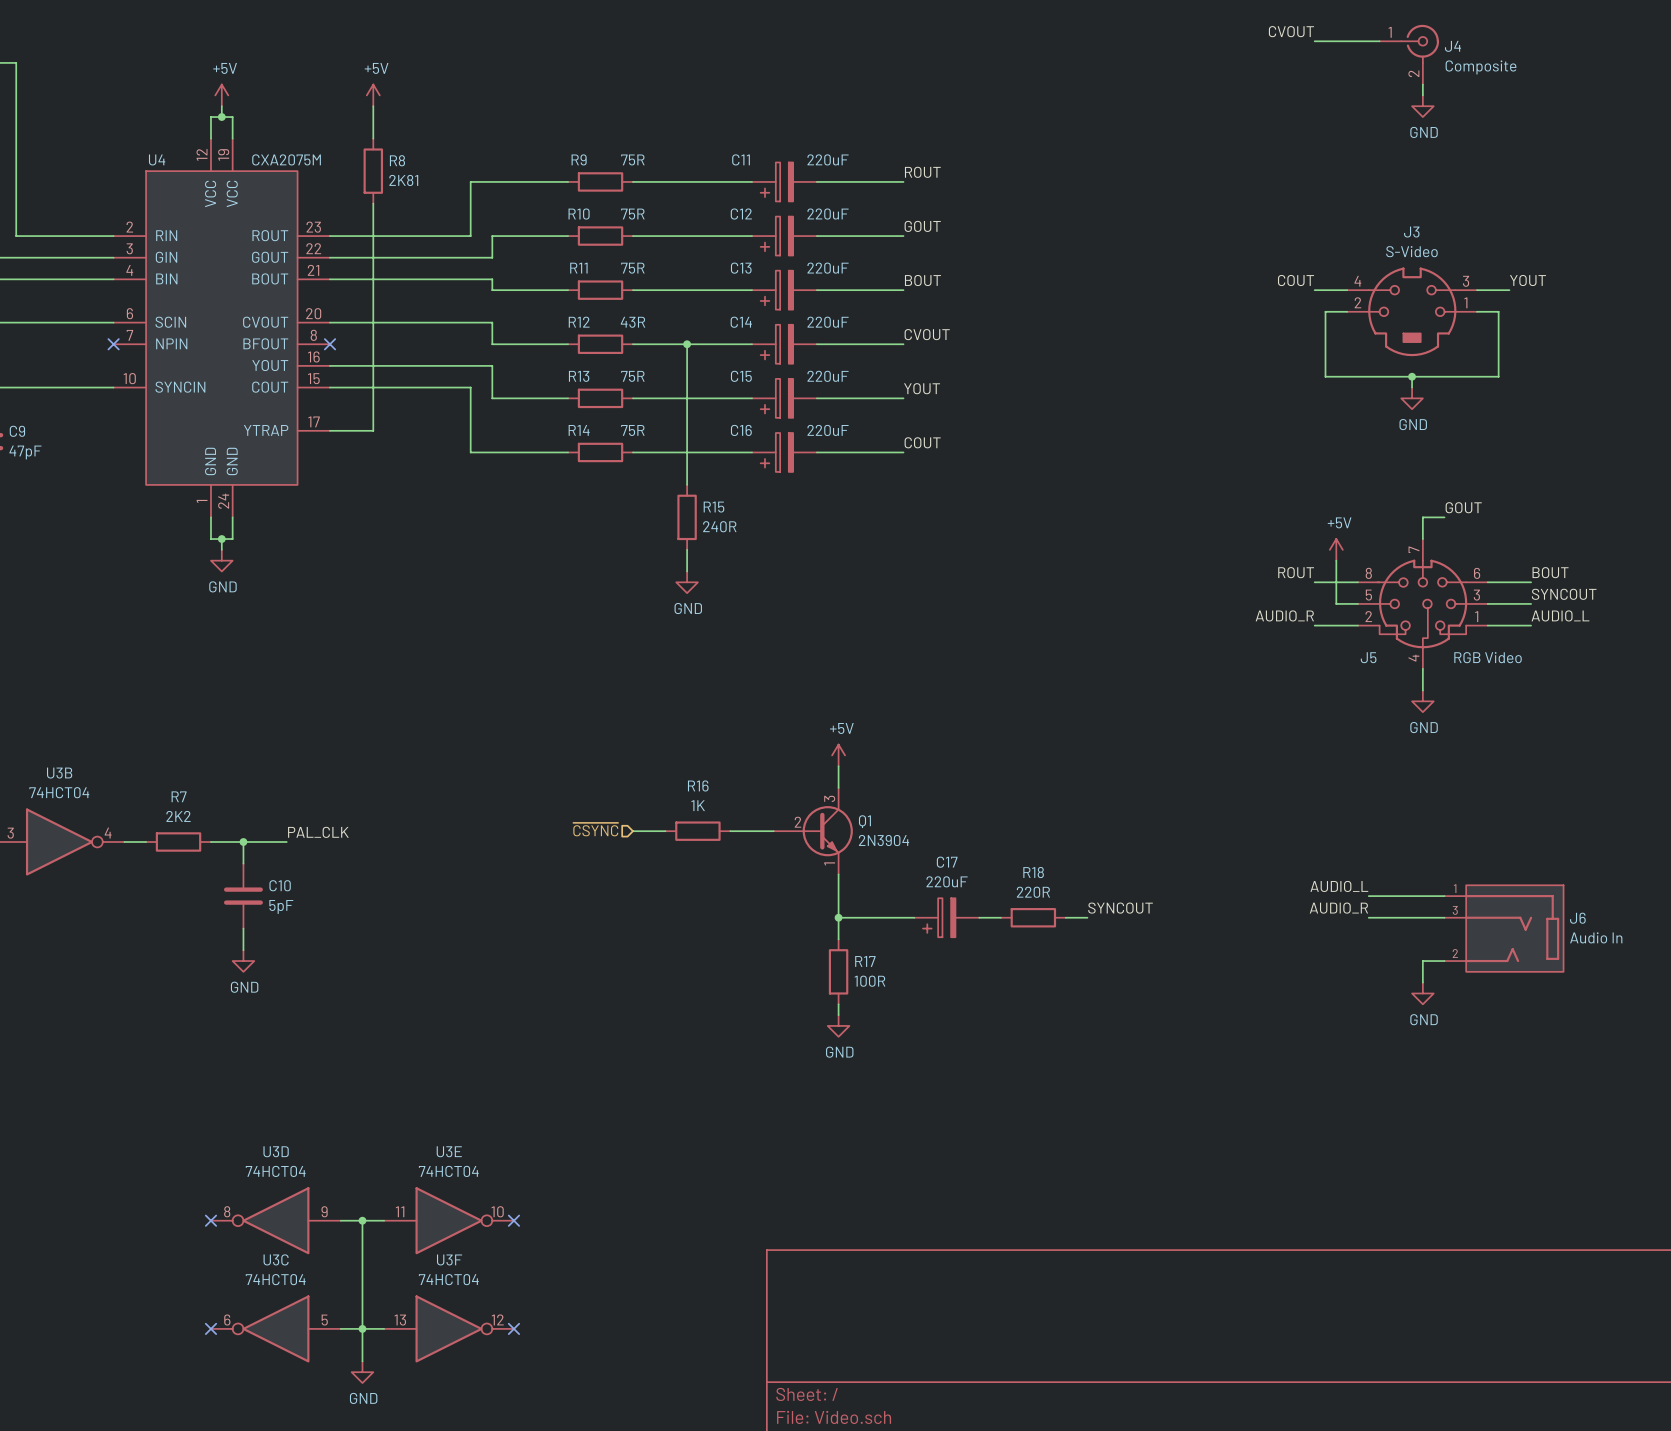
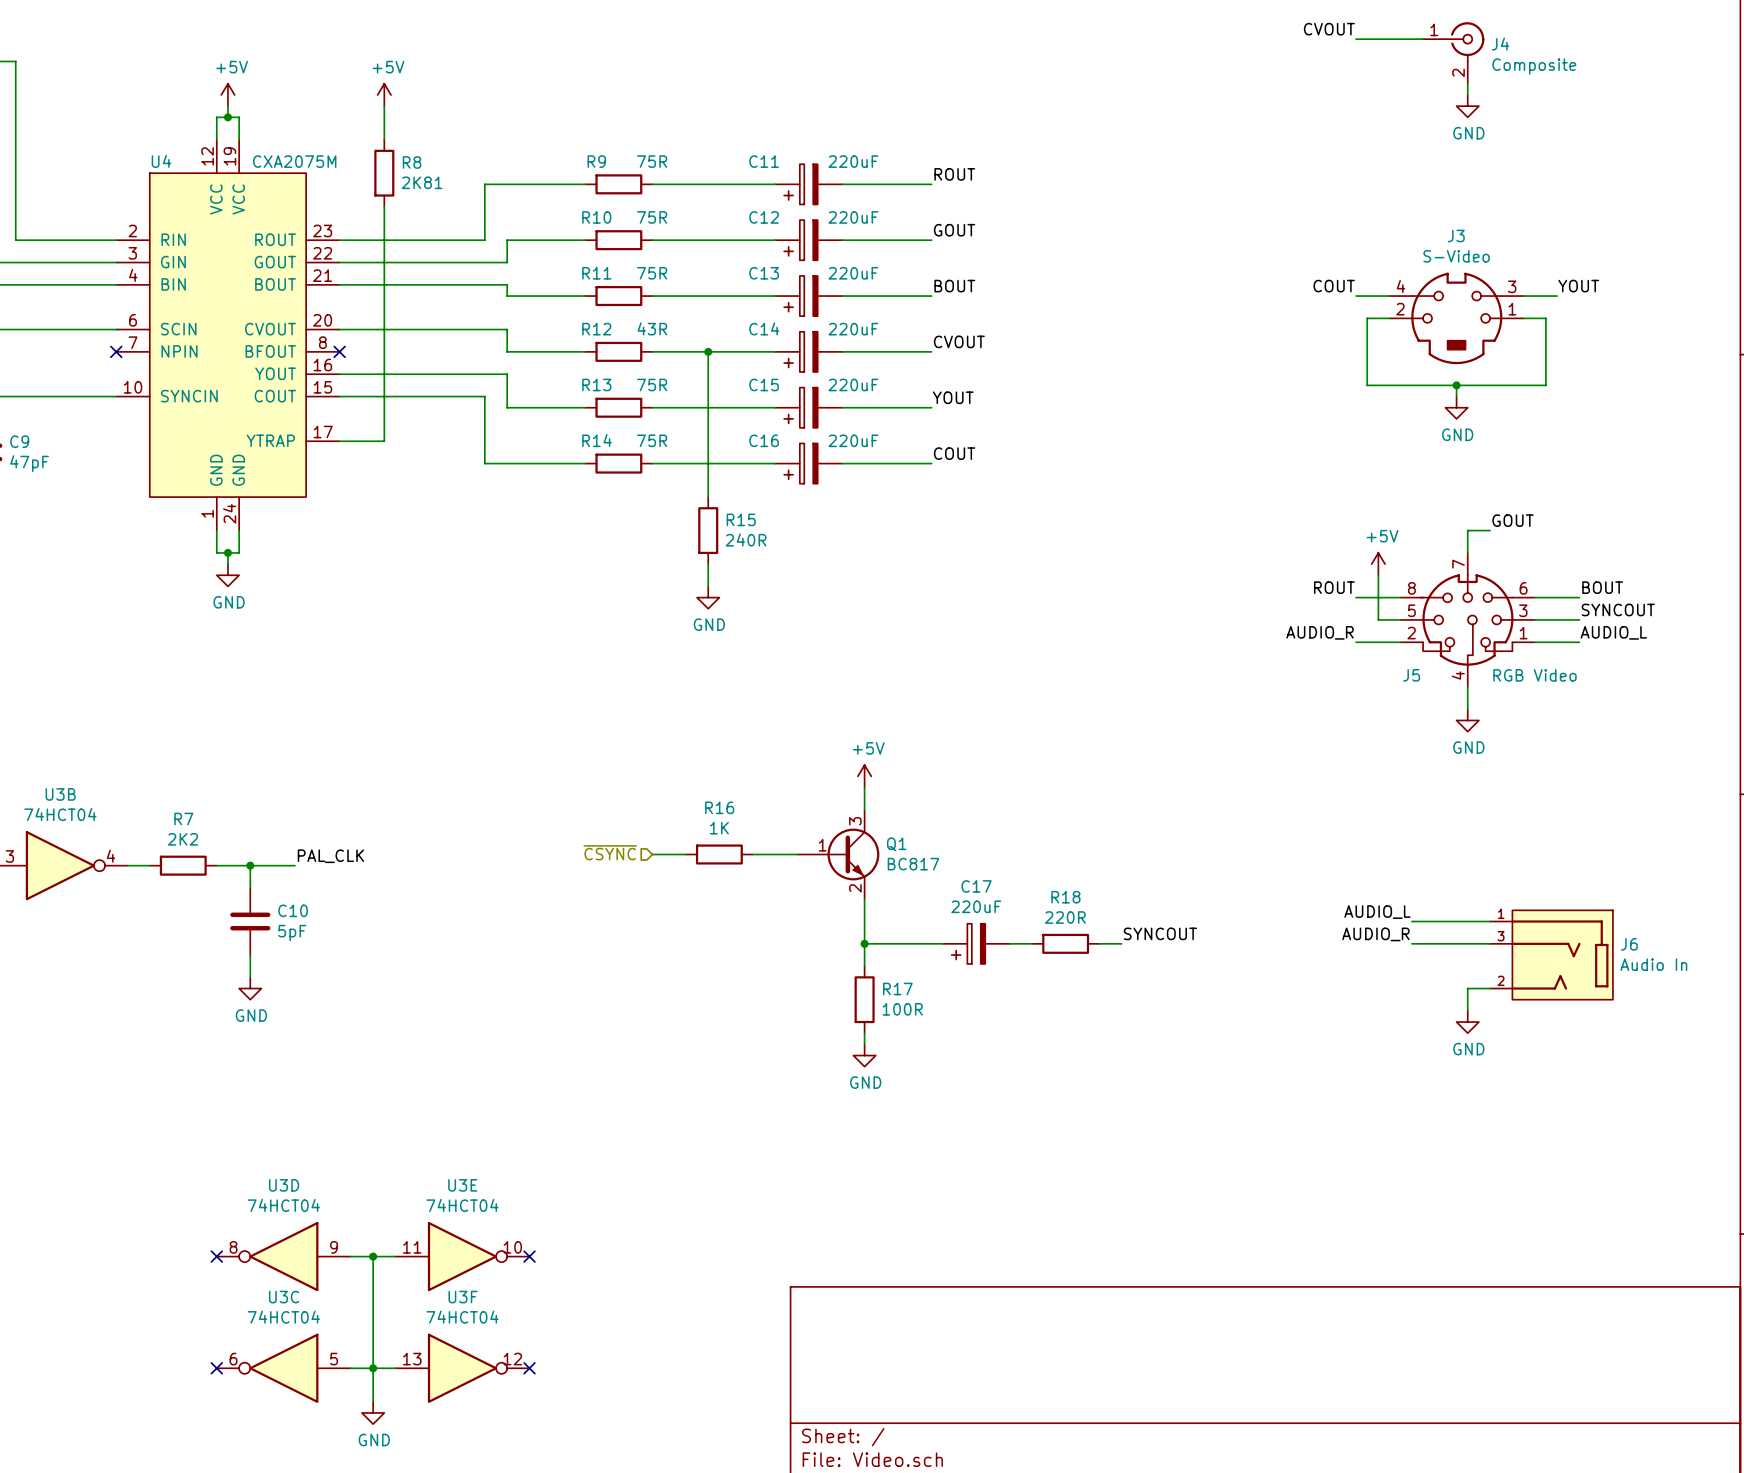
Q1 pin number: 2 (797, 822) -> 1 (822, 845)
Q1 value: 2N3904 (884, 840) -> BC817 (913, 864)
Q1 pin number: 1 (829, 863) -> 2 (855, 888)

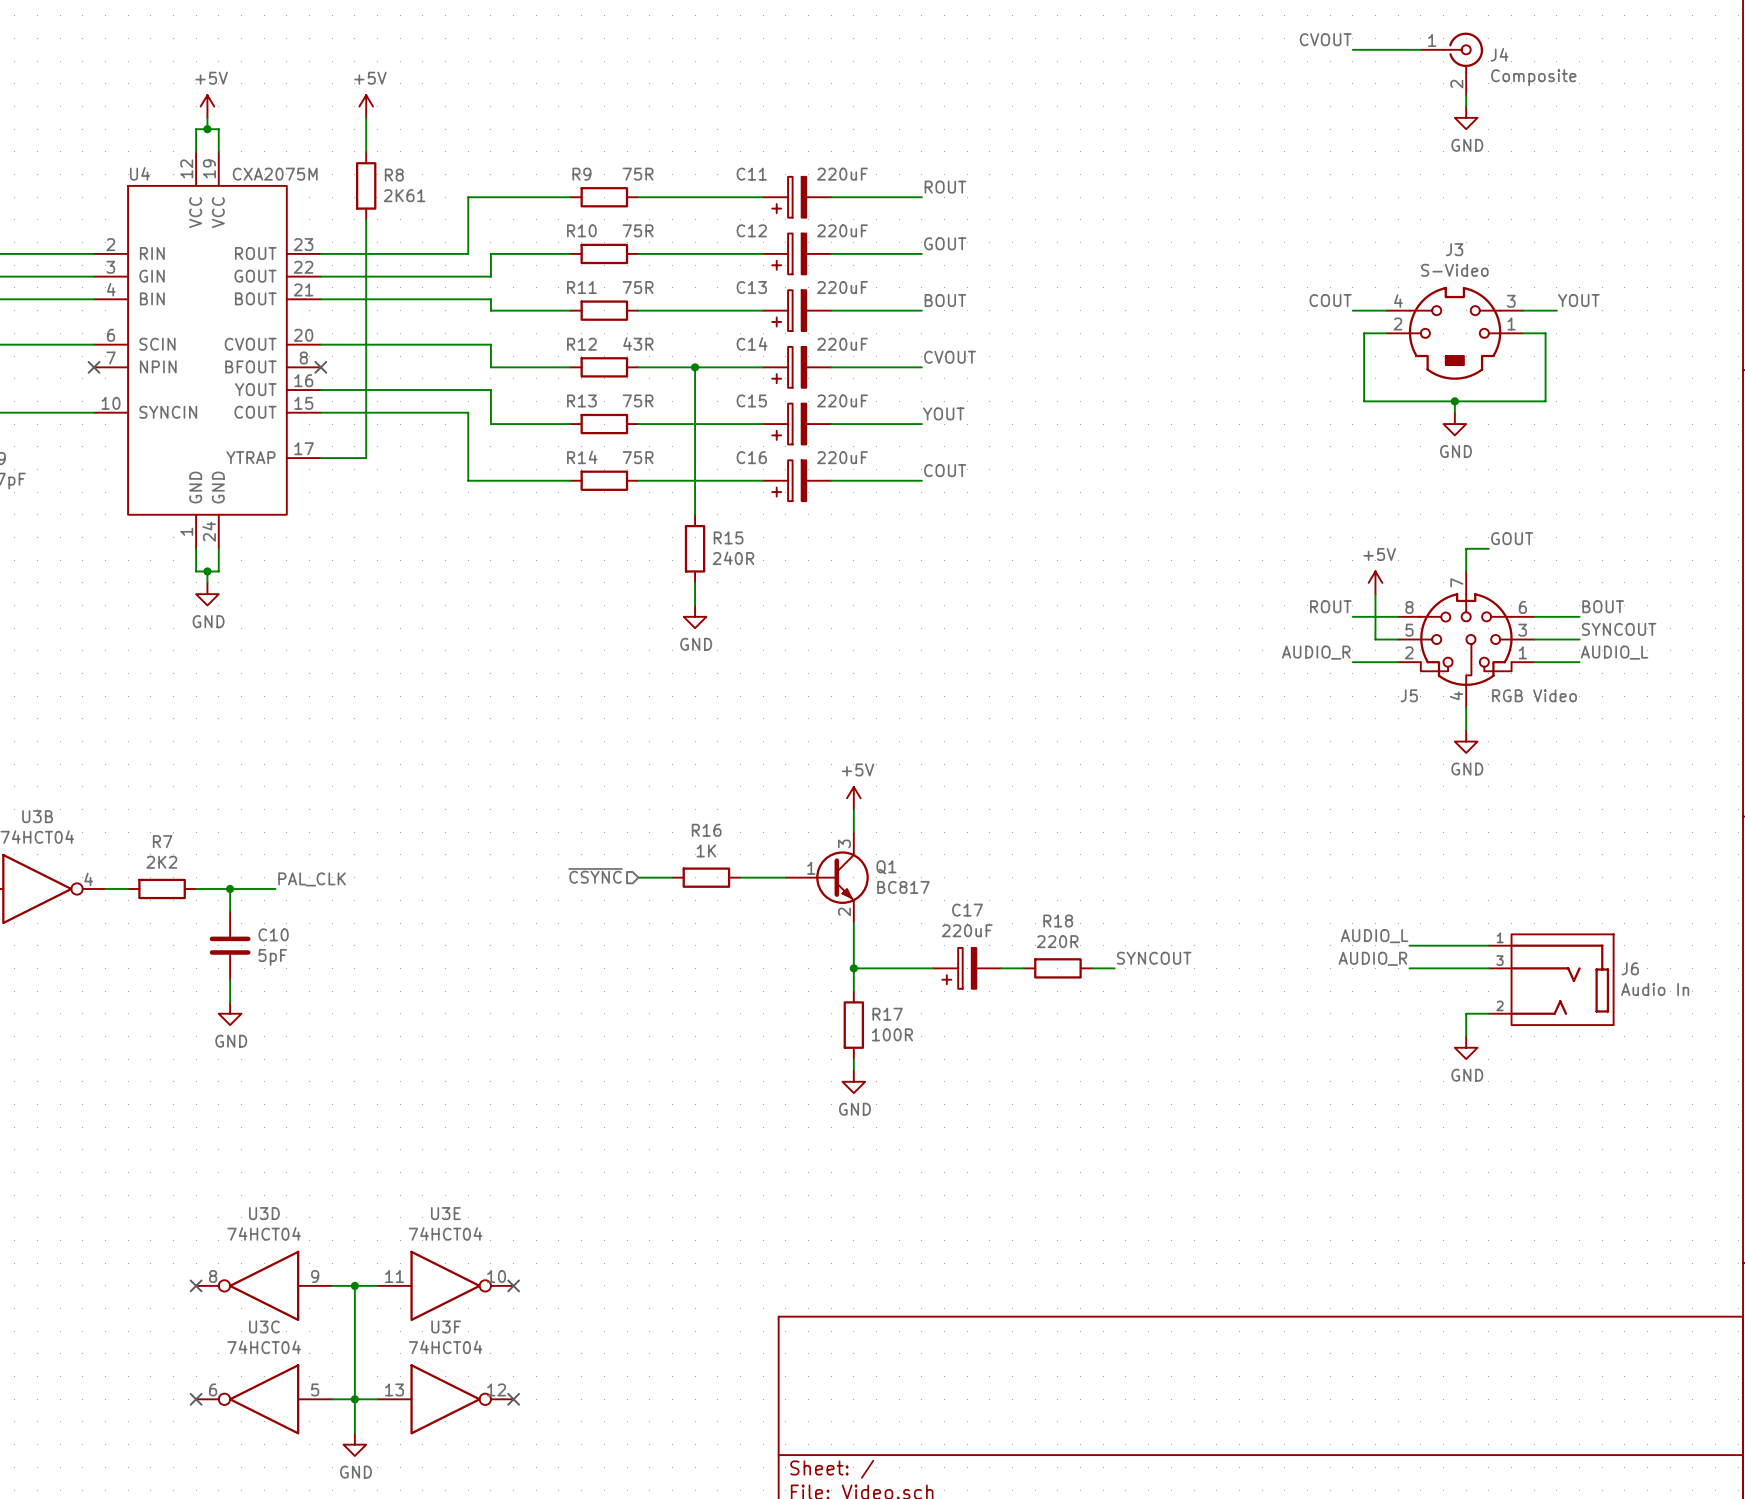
R8 value: 2K81 (422, 182) -> 2K61 (404, 195)

